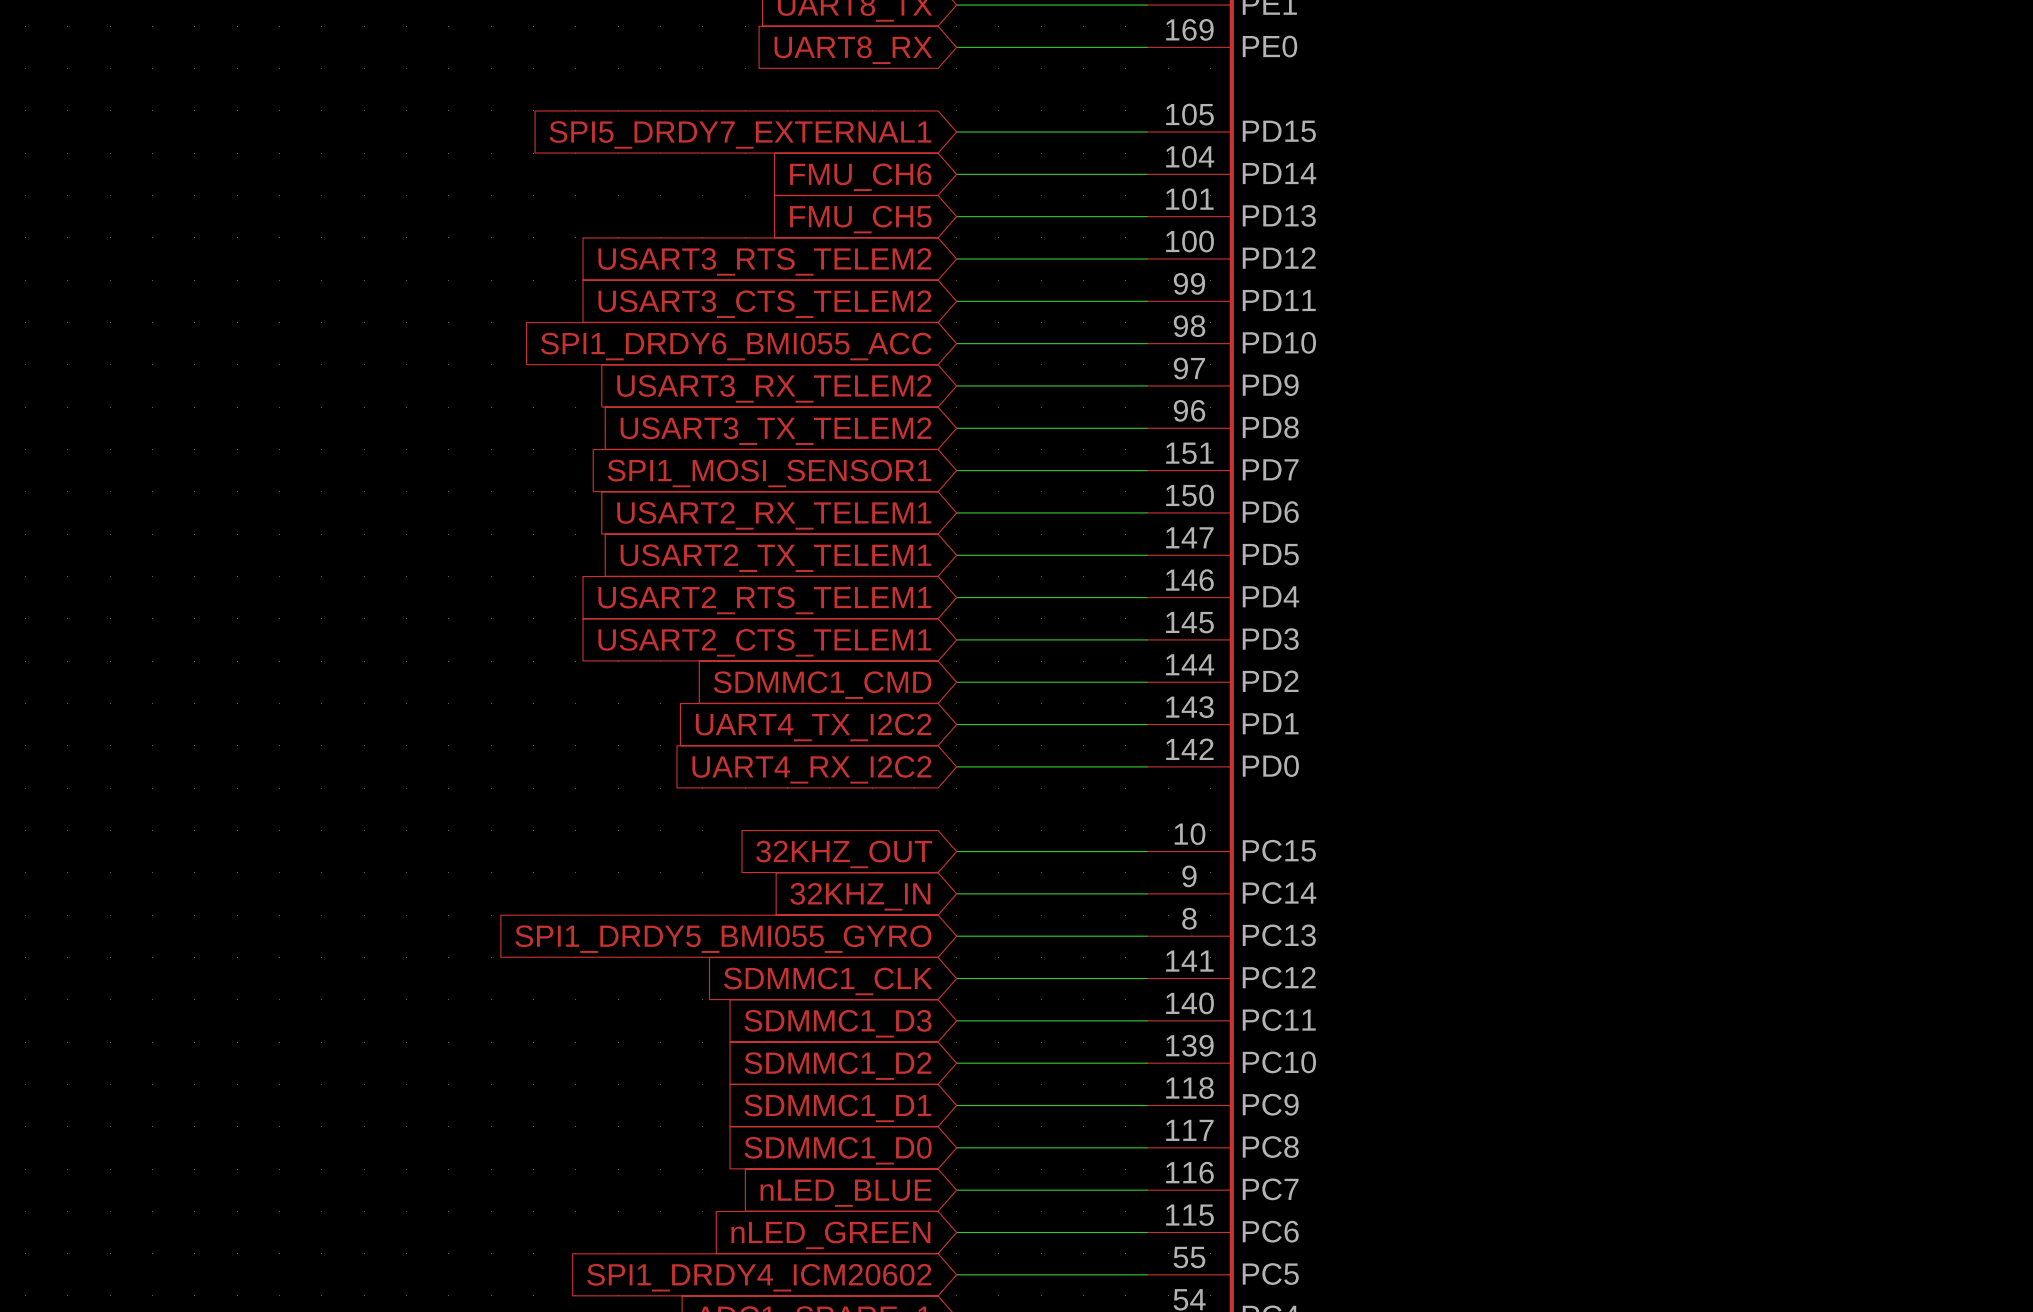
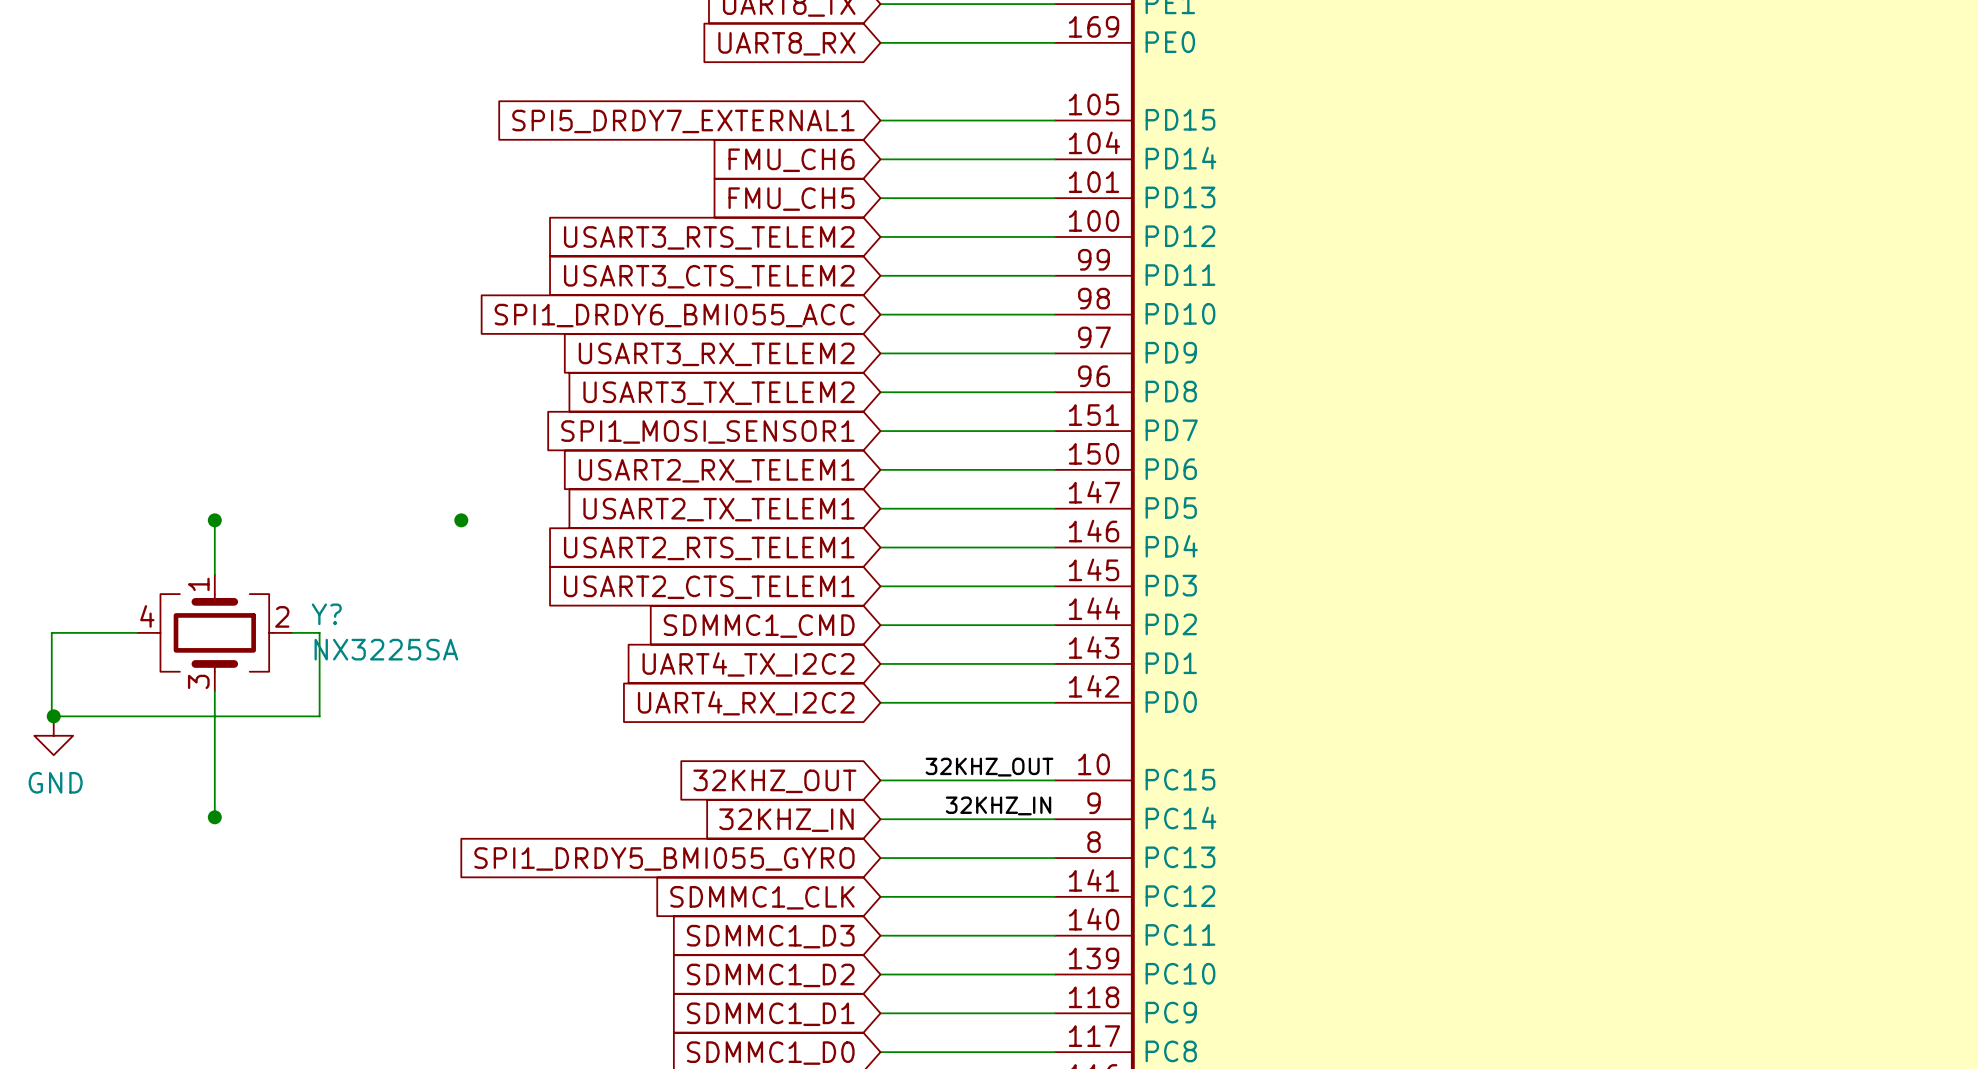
wire: none -> (214, 520) (214, 574)
junction: none -> (214, 520)
junction: none -> (461, 520)
wire: none -> (137, 632) (51, 632) (51, 716) (319, 716) (319, 632) (292, 632)
Y?: none -> NX3225SA (214, 632)
wire: none -> (214, 691) (214, 817)
junction: none -> (53, 716)
power symbol: none -> GND (53, 735)
label: none -> 32KHZ_OUT (989, 767)
label: none -> 32KHZ_IN (998, 805)
junction: none -> (214, 817)

